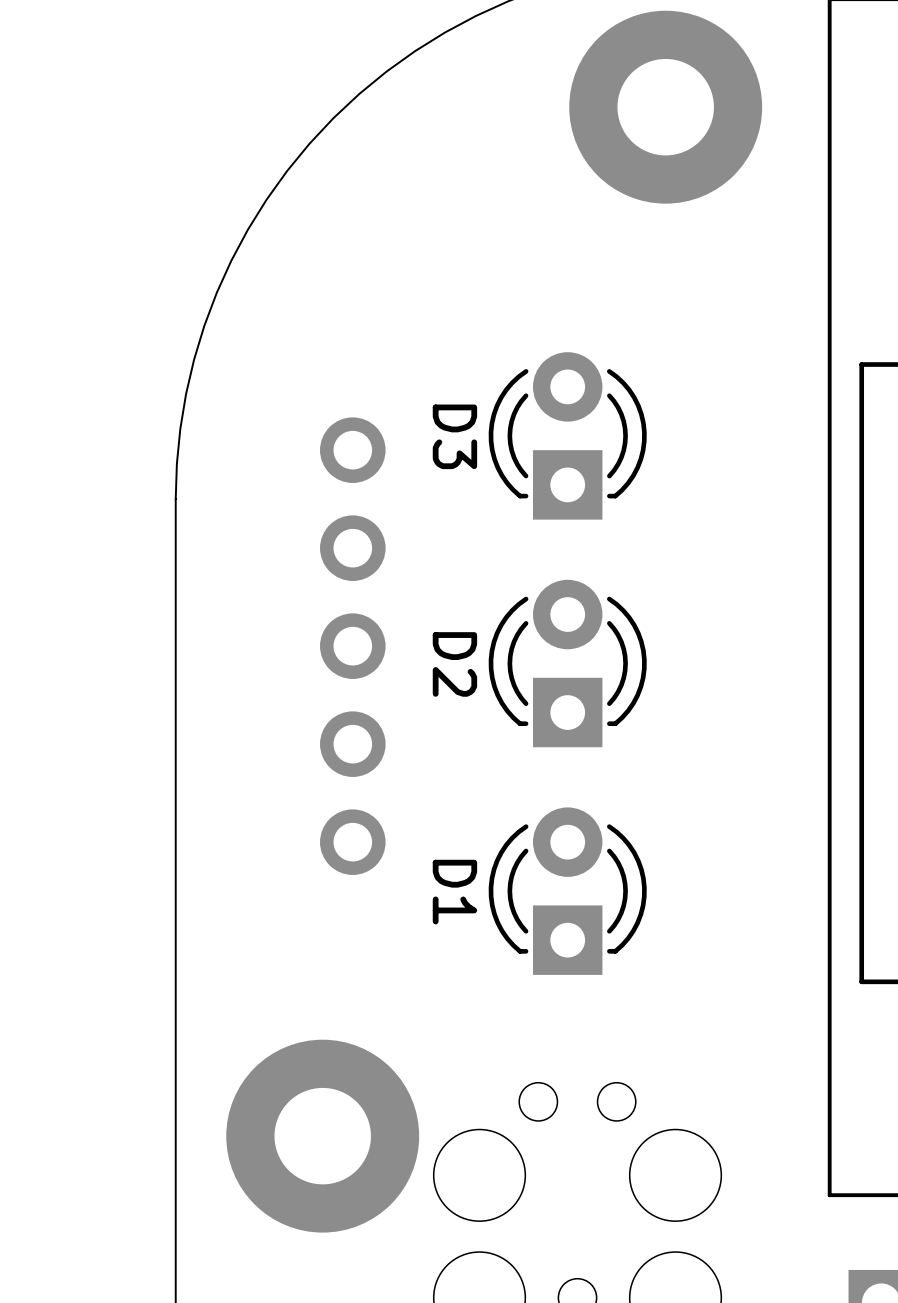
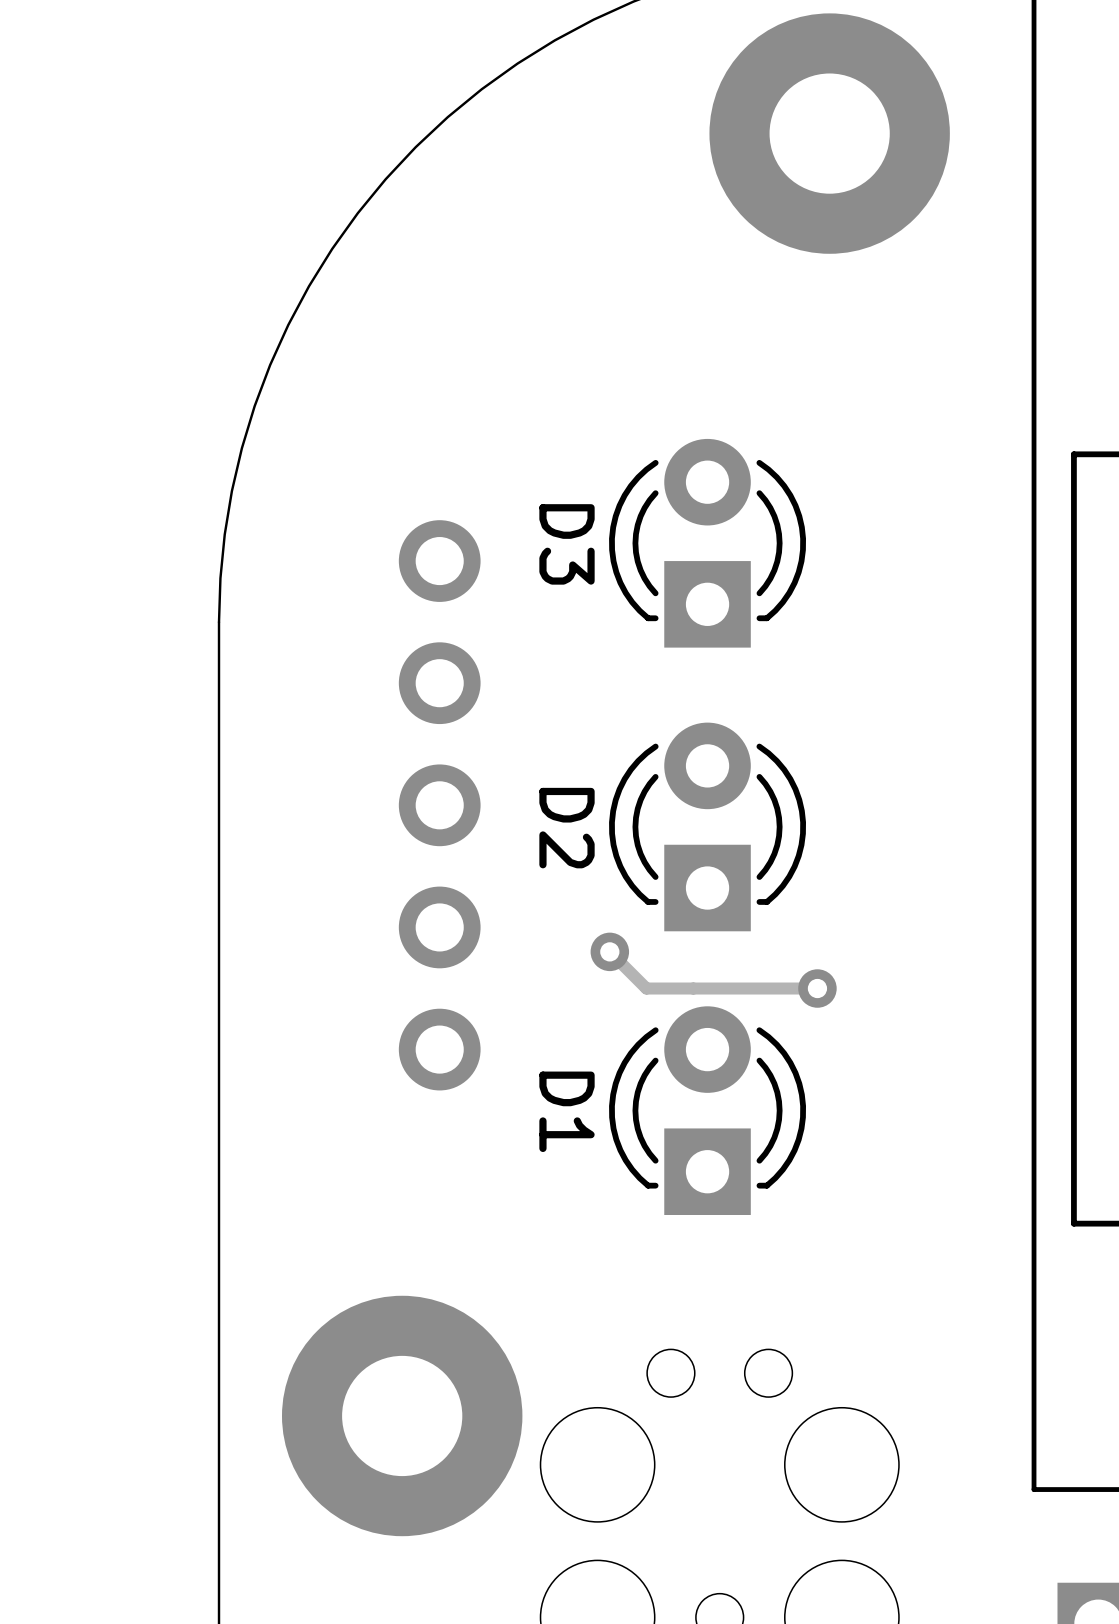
track: none -> (609, 951) (646, 988) (817, 988)
via: none -> (609, 951)
via: none -> (817, 988)

